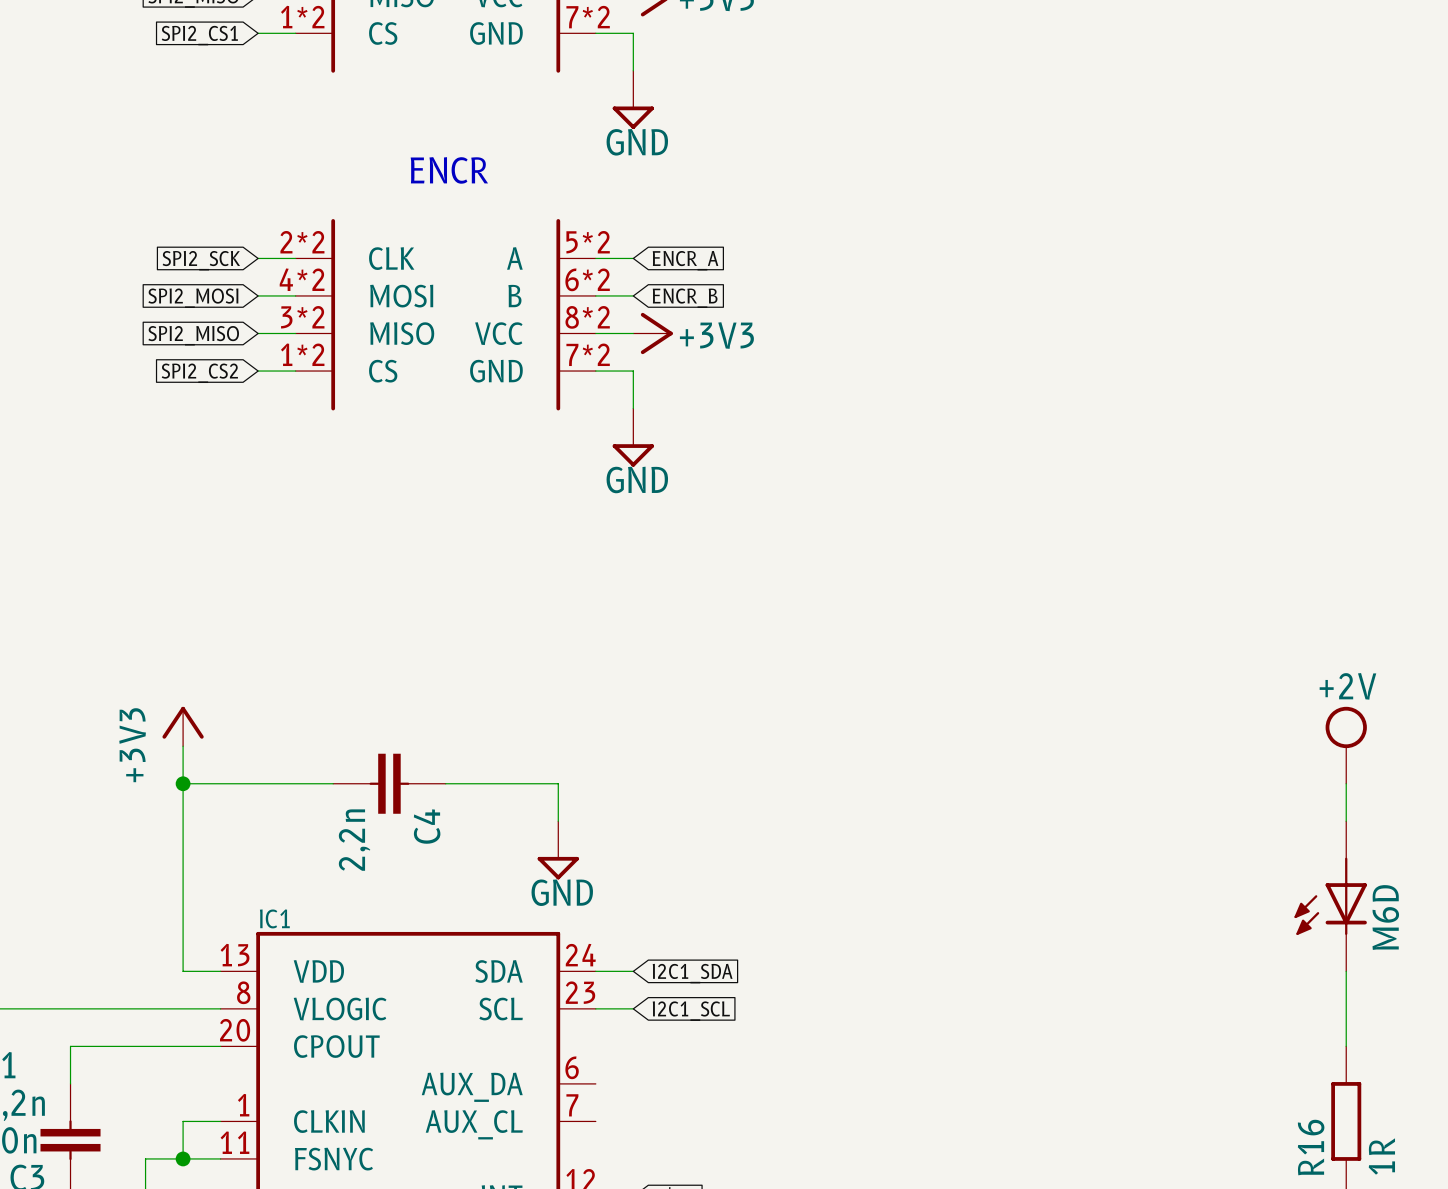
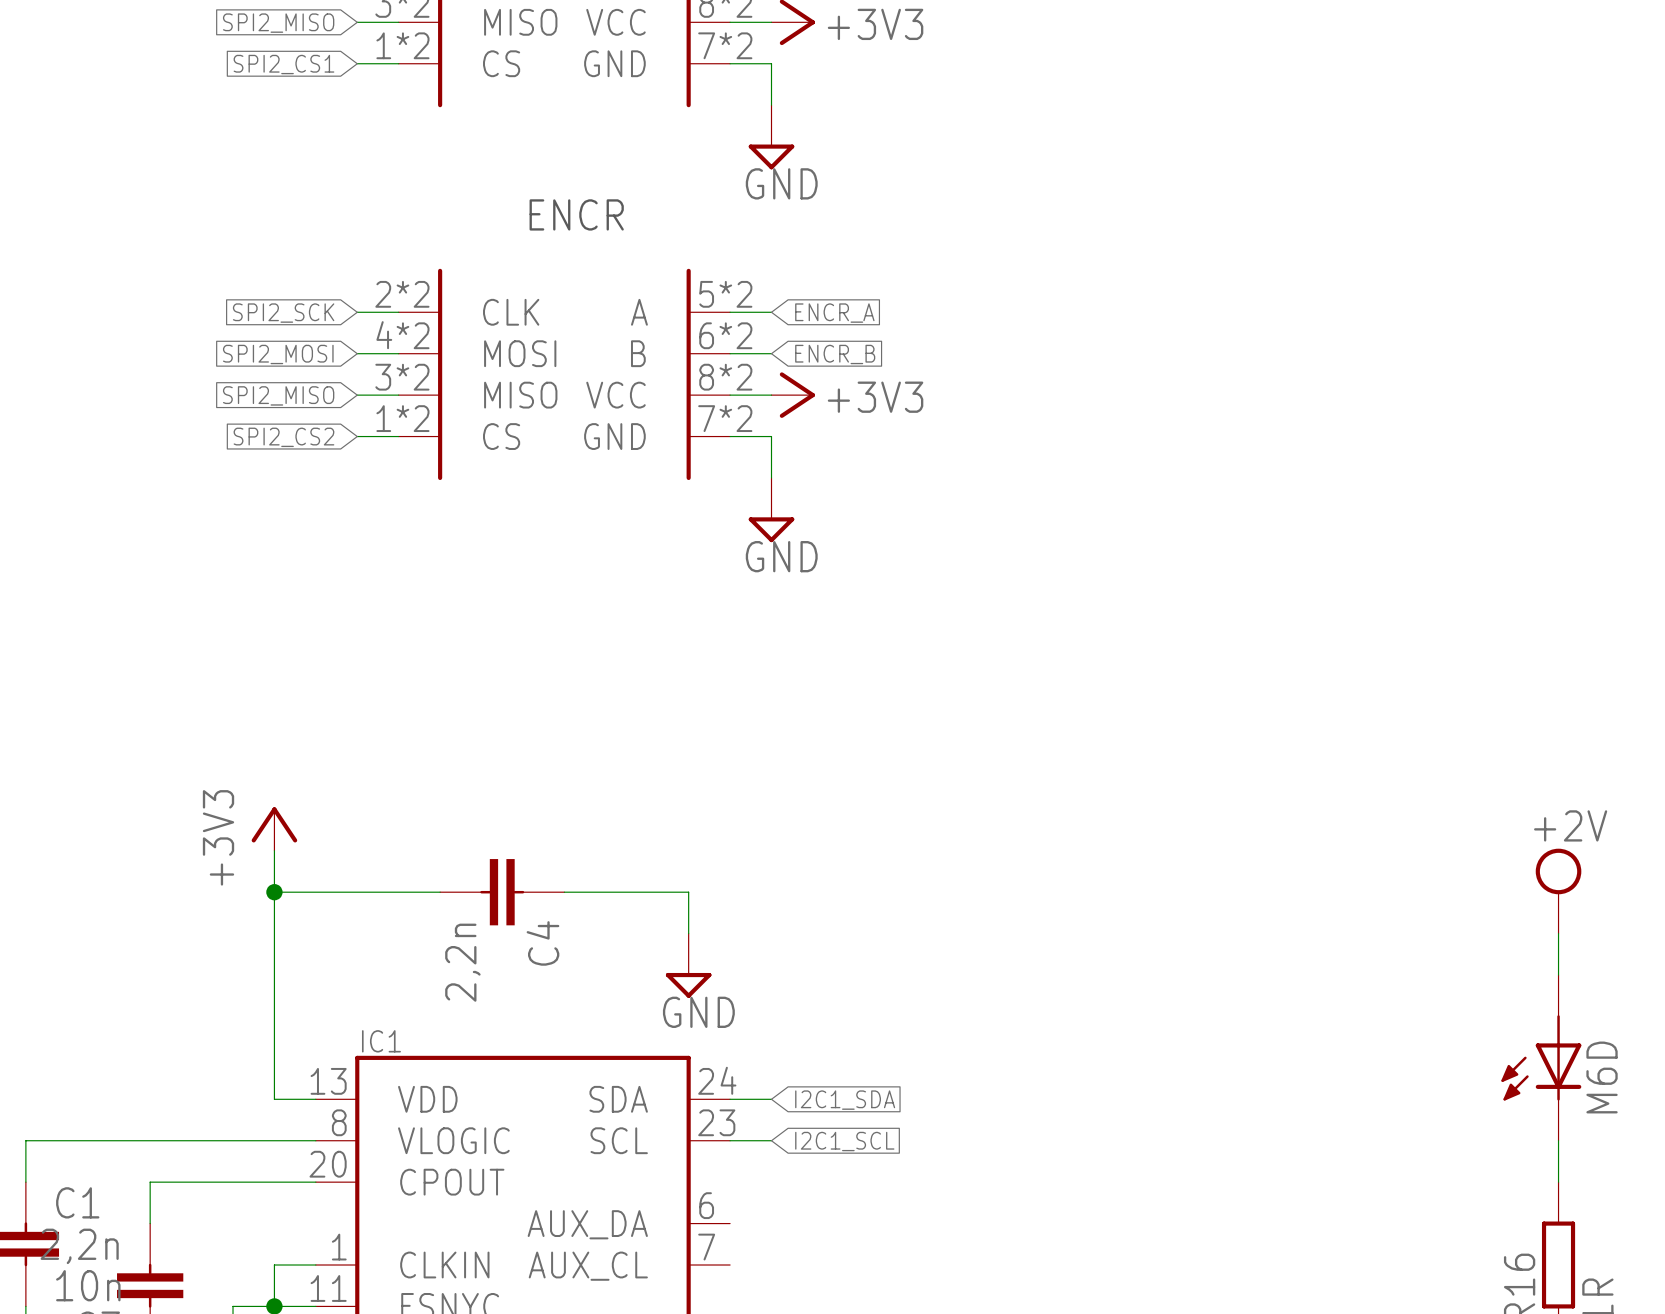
power symbol position: +2V (1346, 745) -> +2V (1558, 891)
M6D position: (1330, 896) -> (1541, 1057)

